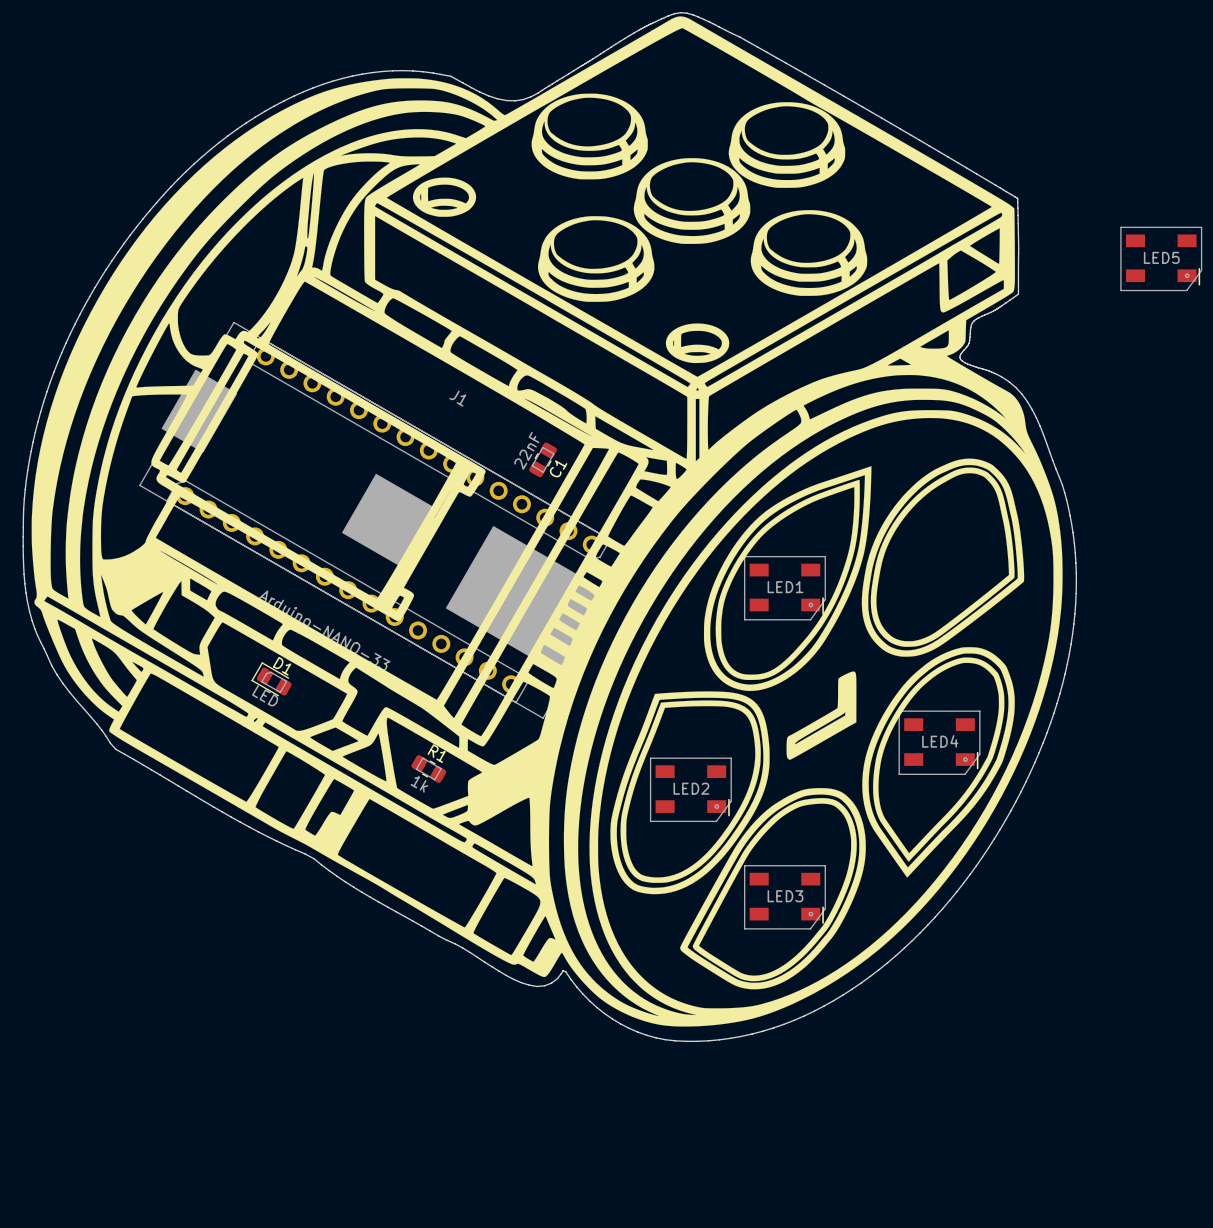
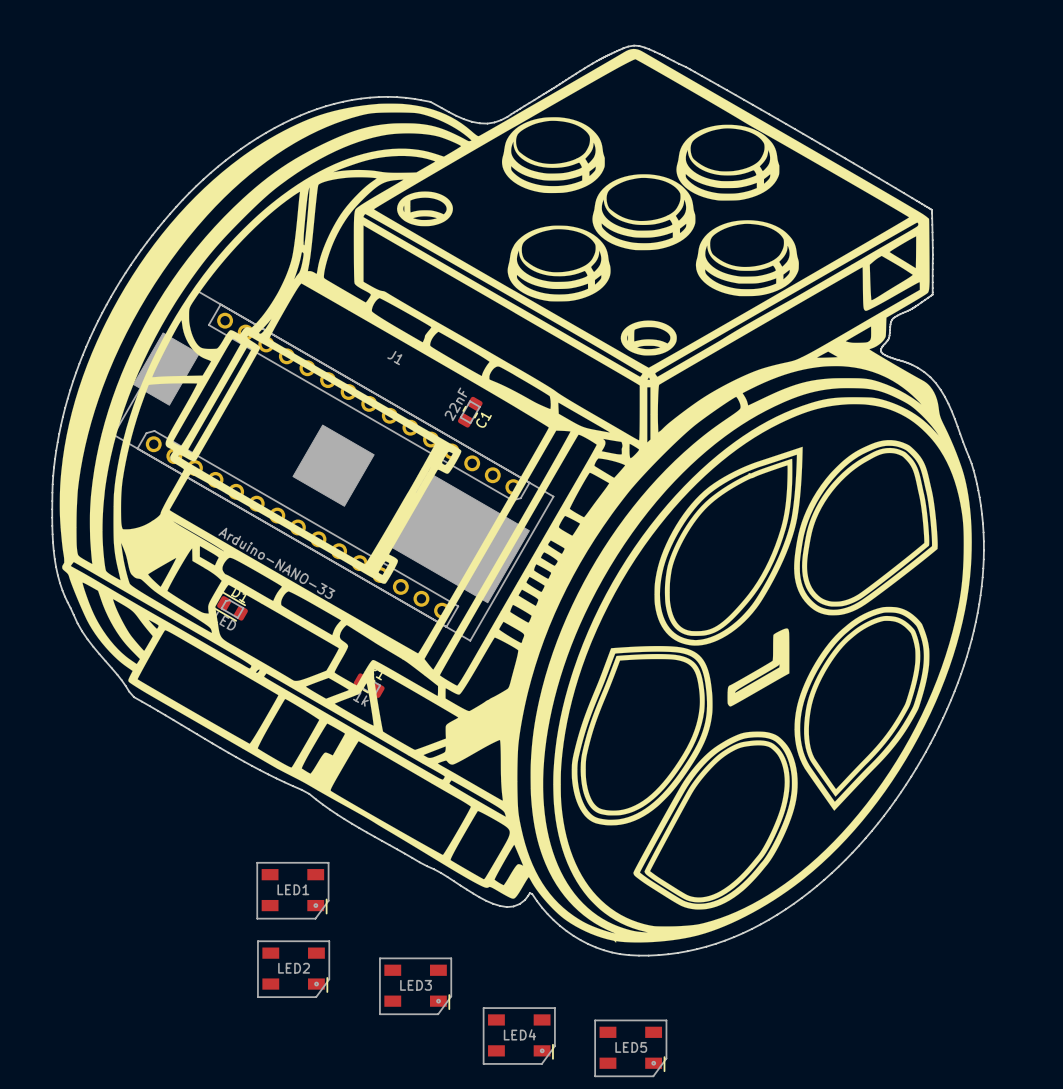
drawing: [22, 12, 1077, 1042] -> none
drawing: none -> [51, 45, 985, 957]
LED5 position: (1161, 258) -> (630, 1048)
LED1 position: (784, 588) -> (292, 890)
LED4 position: (939, 742) -> (519, 1036)
LED2 position: (690, 789) -> (293, 969)
LED3 position: (784, 897) -> (415, 986)

